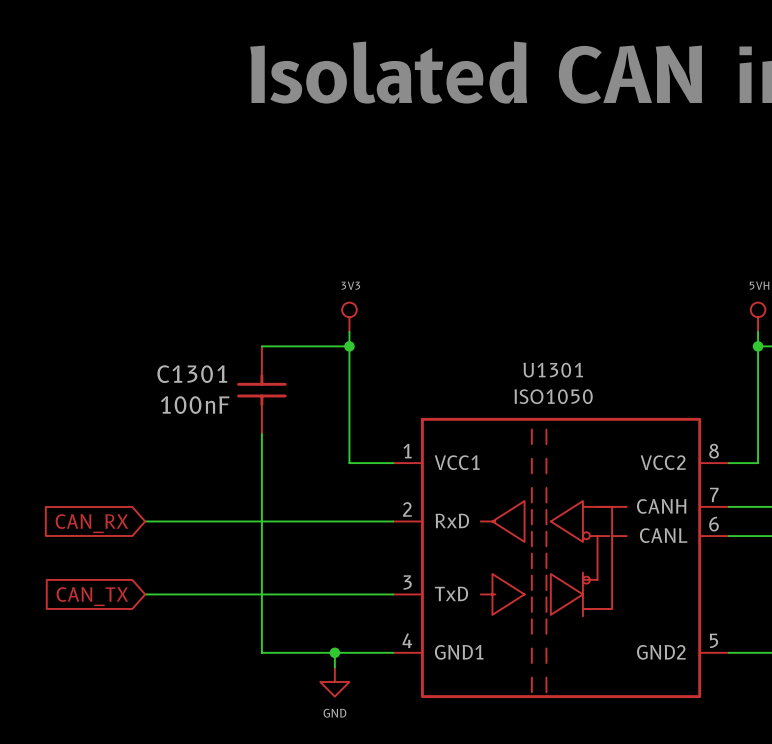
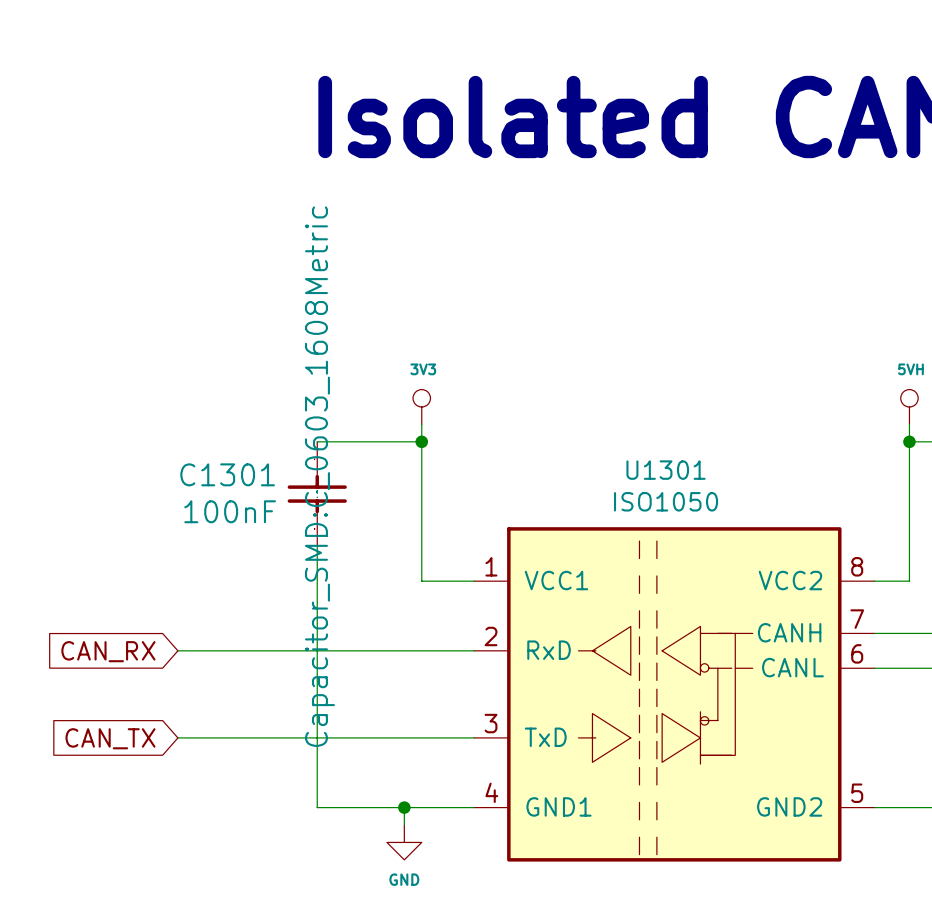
C1301 text: none -> Capacitor_SMD:C_0603_1608Metric (319, 476)

